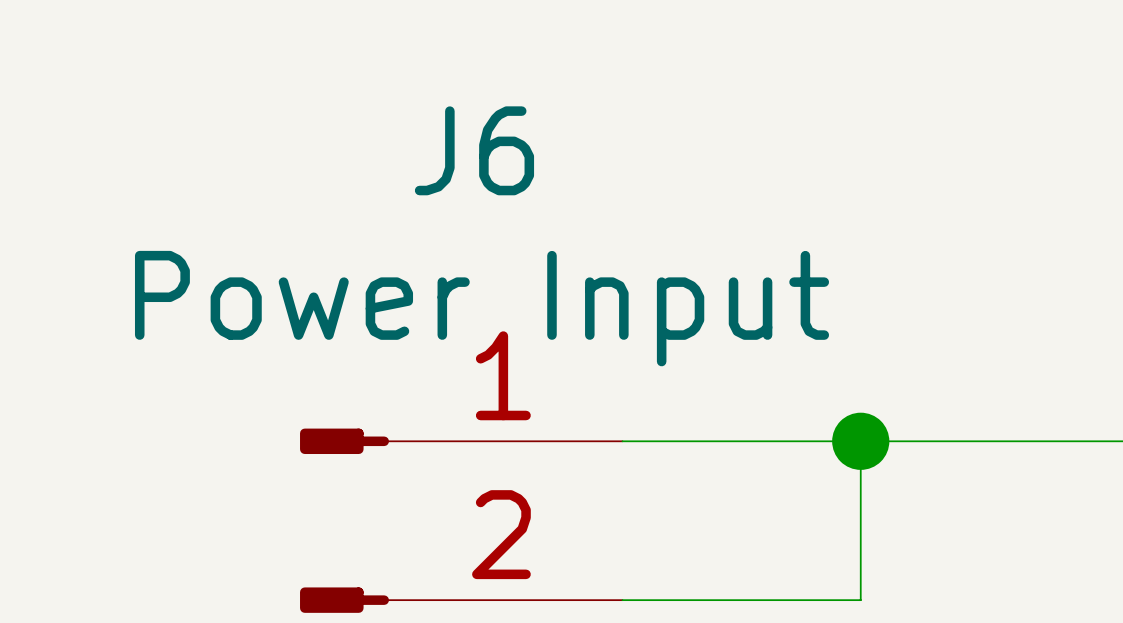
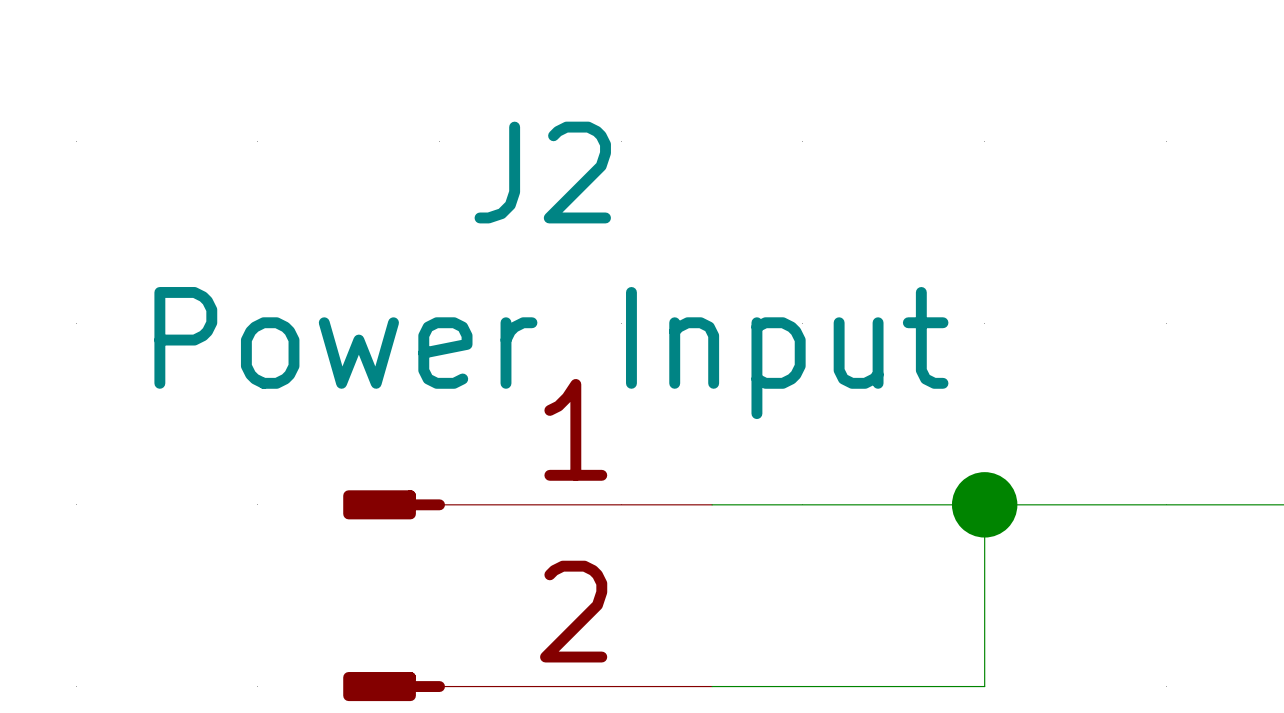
J6 name: J6 (474, 150) -> J2 (542, 172)

